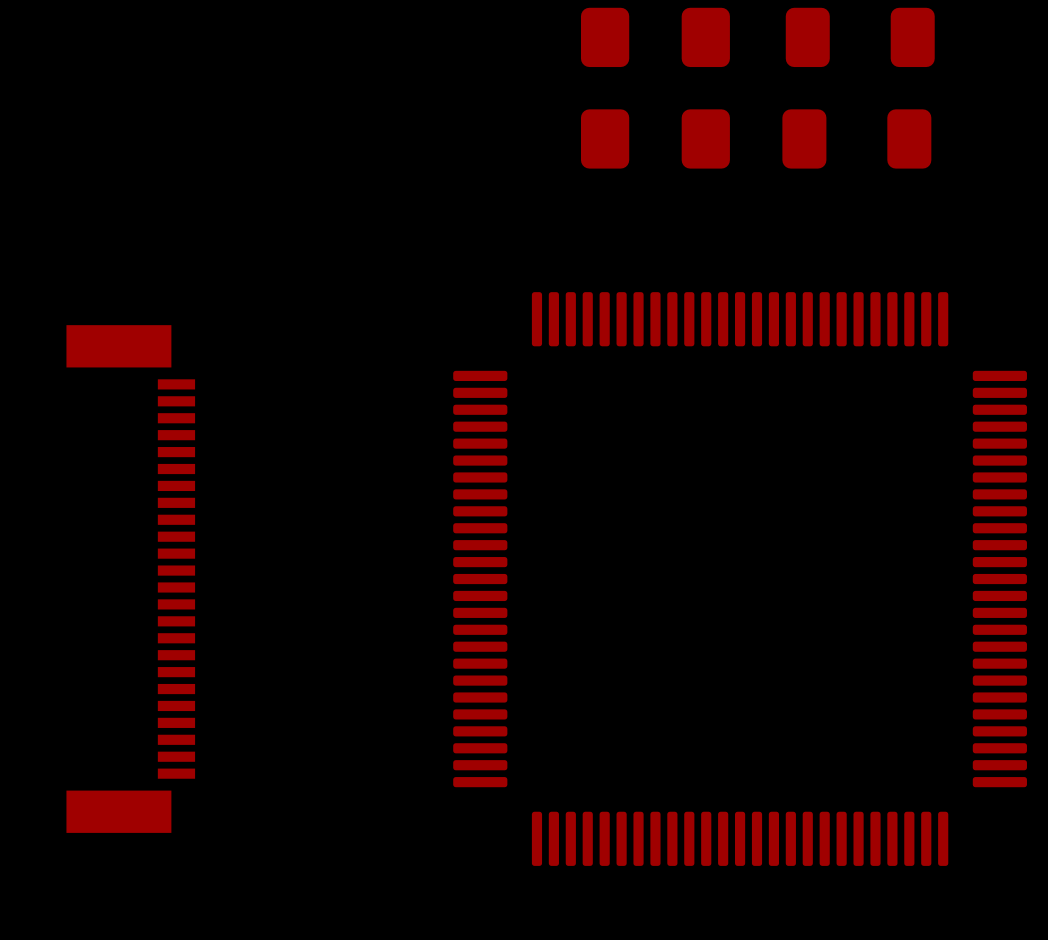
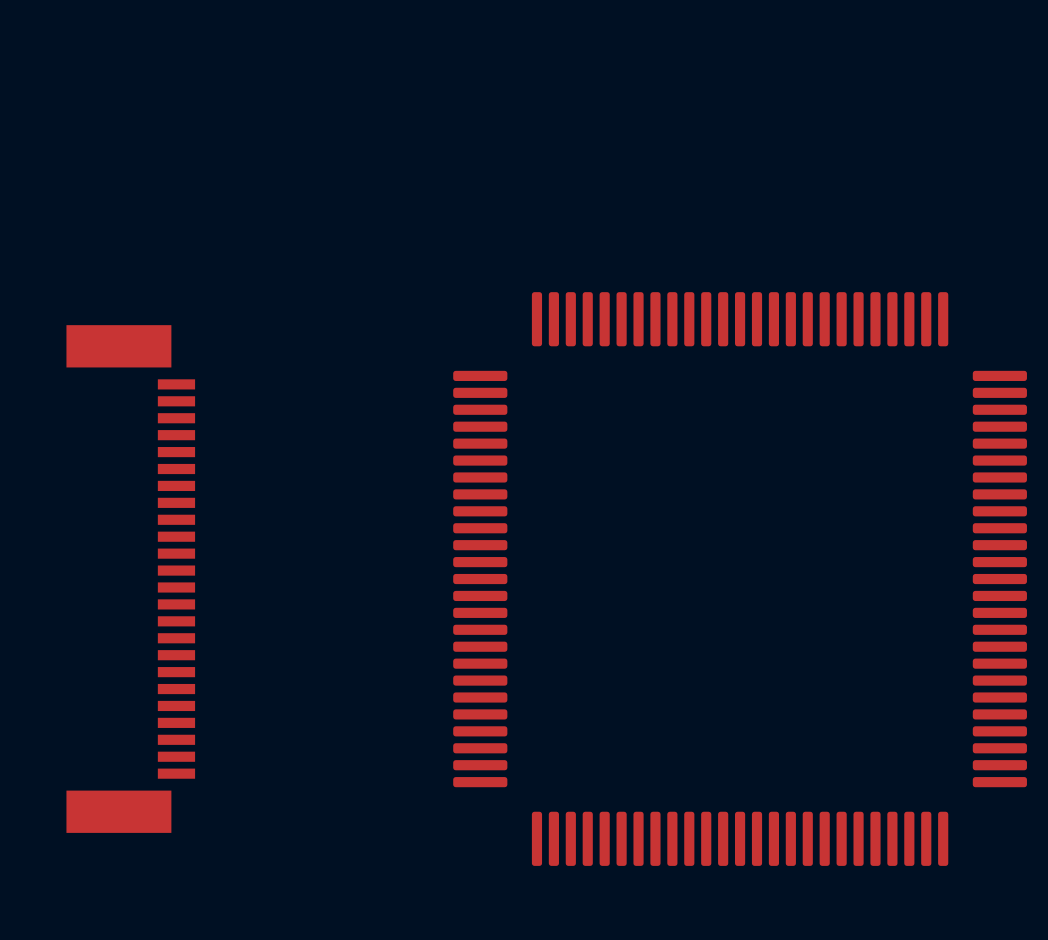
part: (655, 37) -> none
part: (860, 37) -> none
part: (655, 138) -> none
part: (856, 138) -> none

